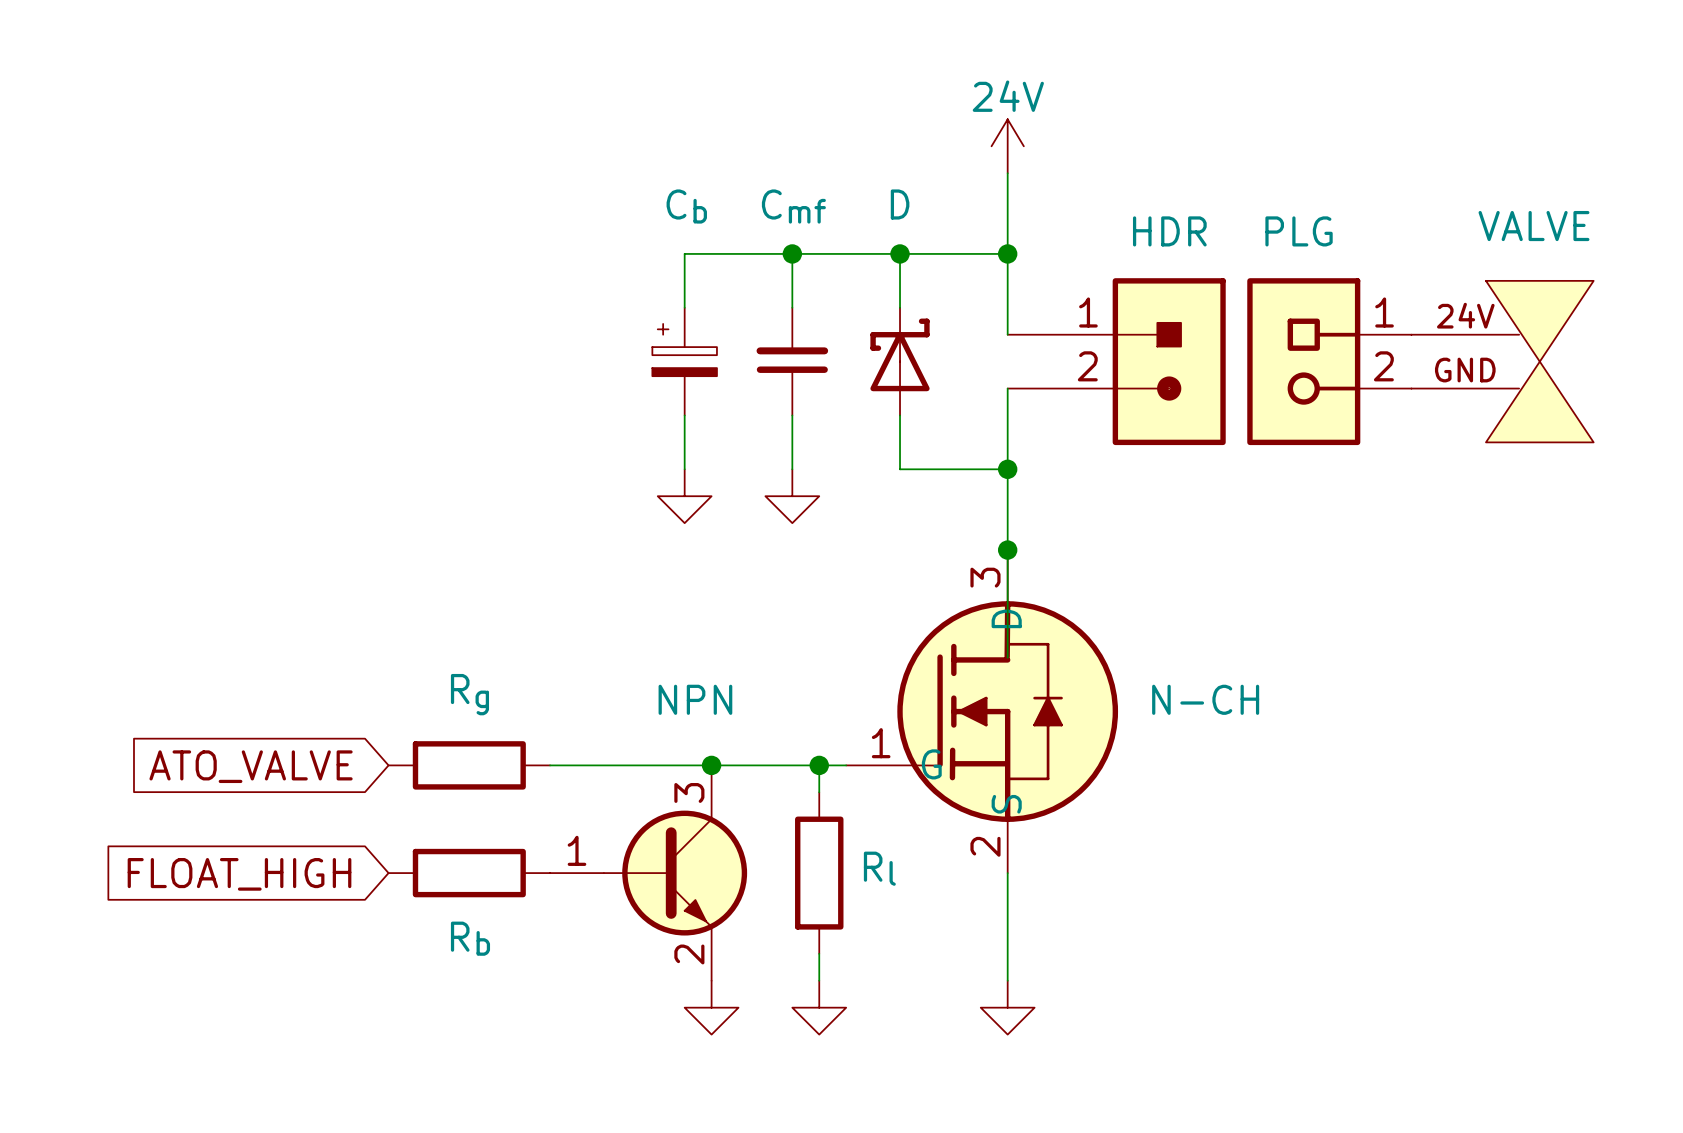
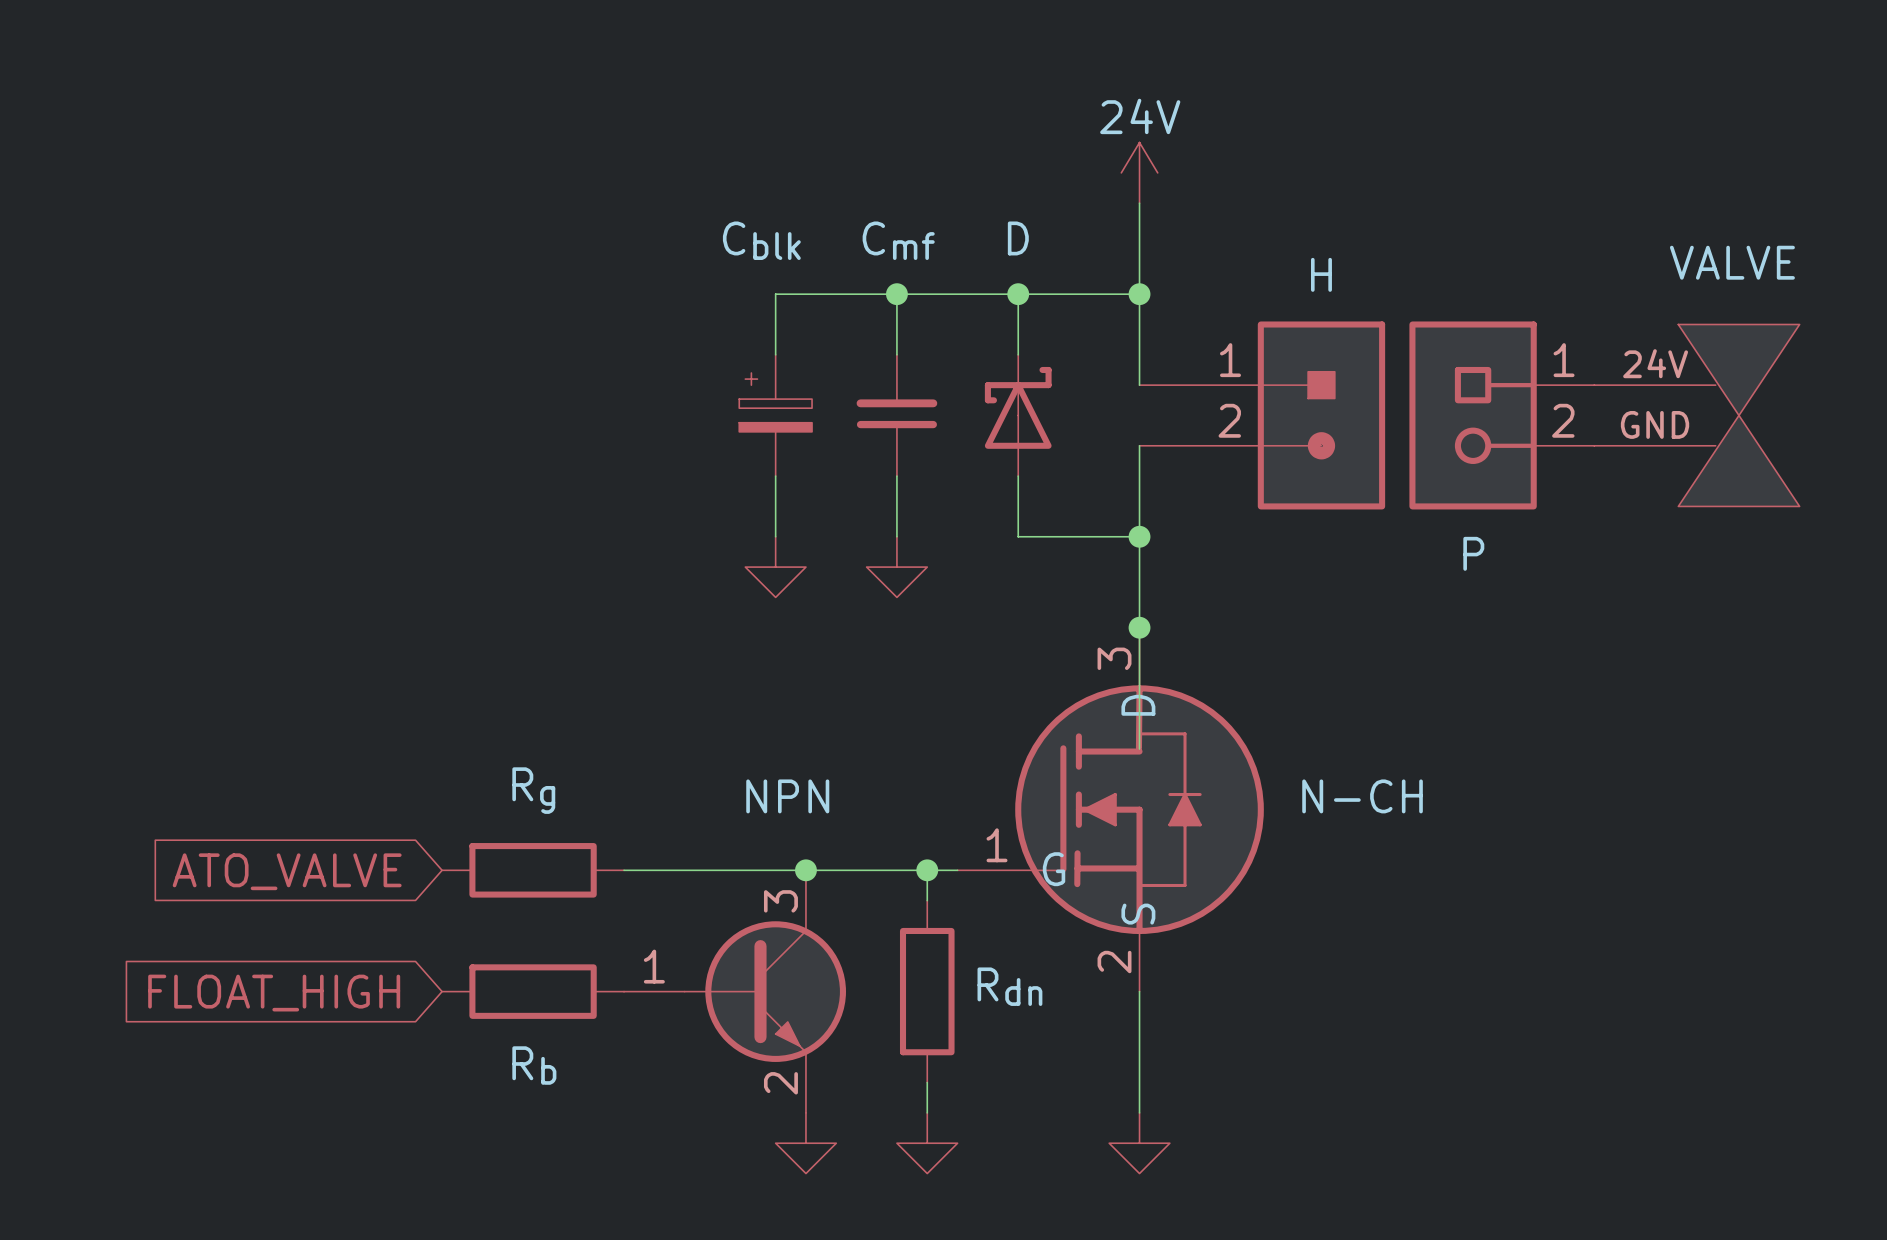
Cb name: Cb (686, 206) -> Cblk (761, 240)
HDR name: HDR (1169, 231) -> H (1321, 274)
PLG name: PLG (1299, 231) -> P (1473, 553)
Rl name: Rl (879, 868) -> Rdn (1009, 986)

